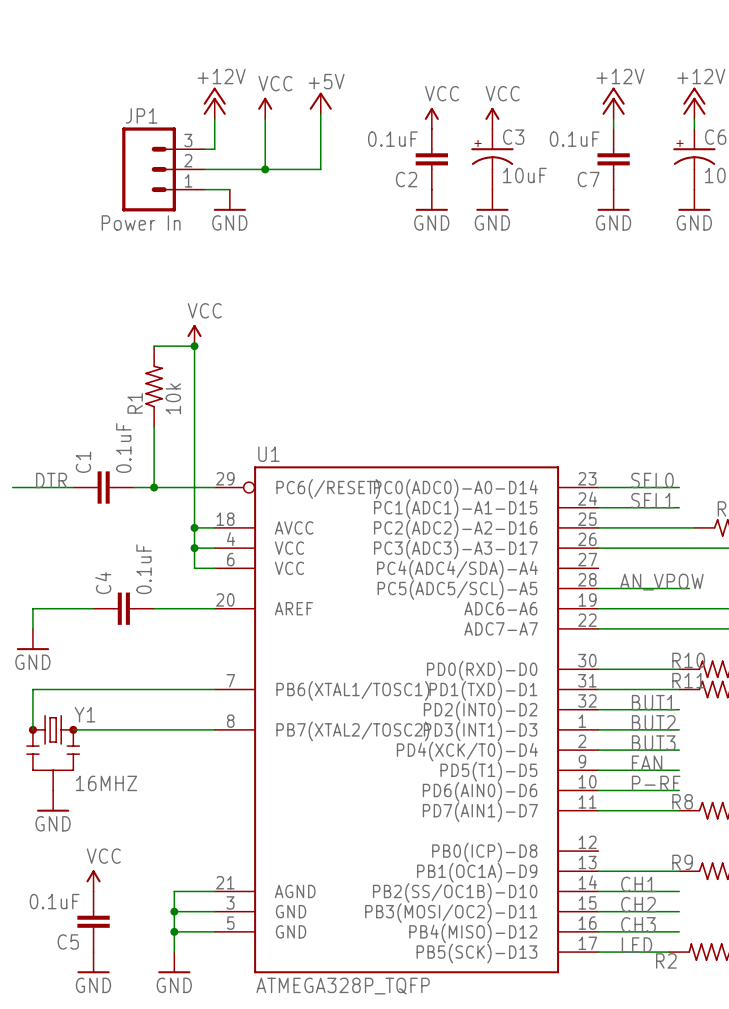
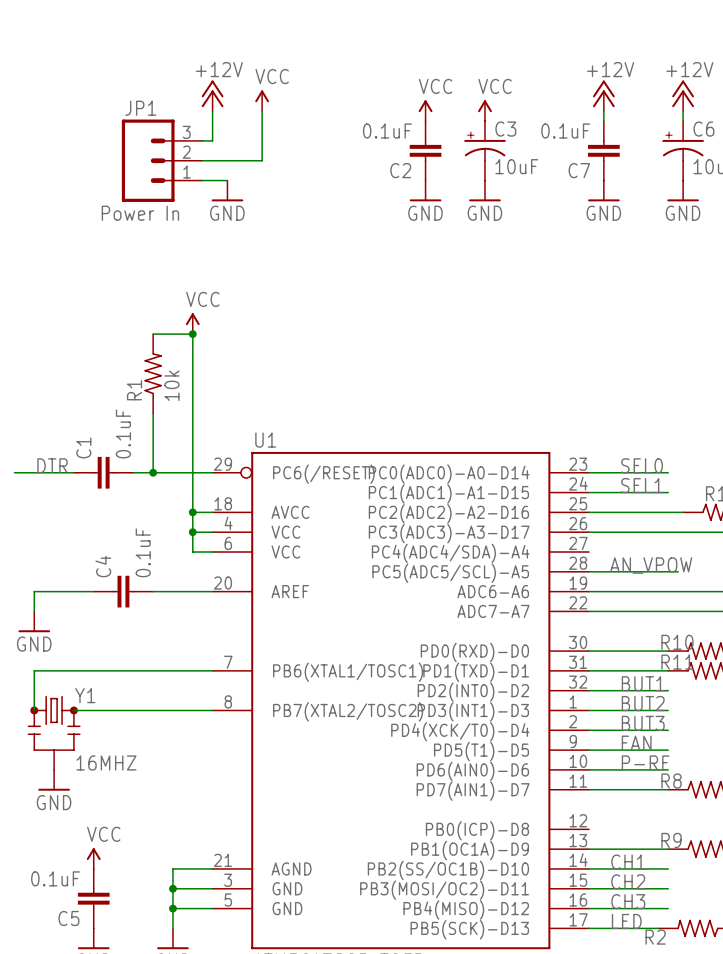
power symbol: +5V (320, 103) -> none
wire: (320, 113) (320, 169) (265, 169) -> none
junction: (265, 169) -> none

